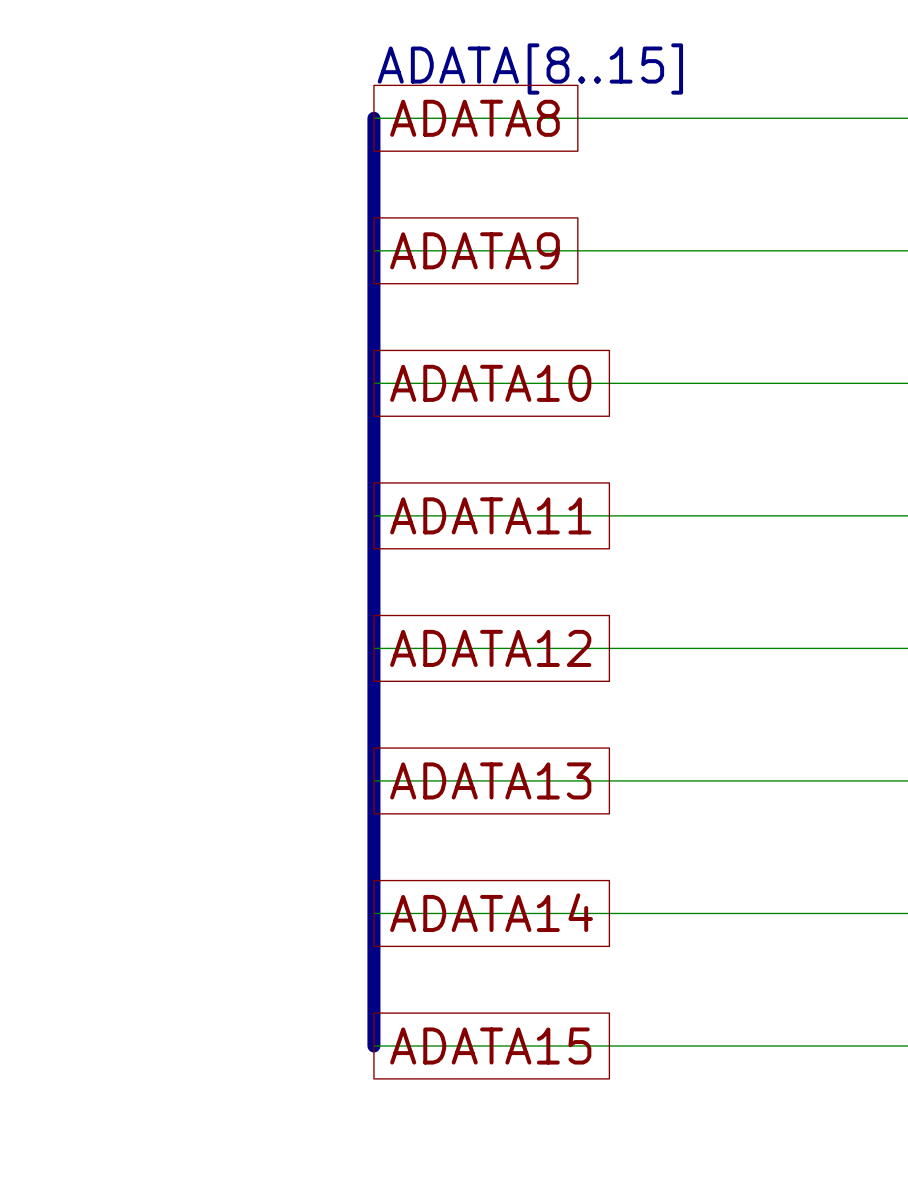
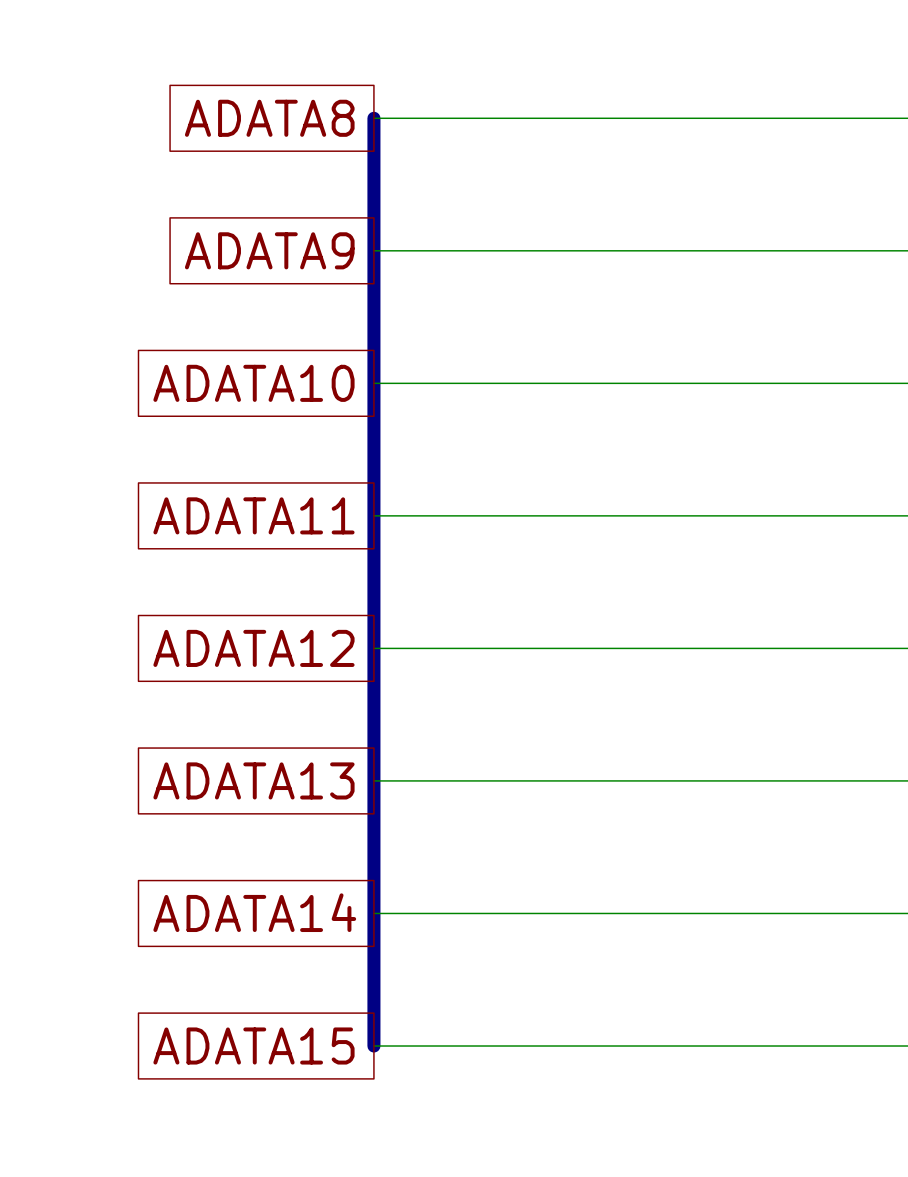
text: ADATA[8..15] (530, 68) -> none
global label rotation: 0° (474, 118) -> 180° (269, 118)
global label rotation: 0° (474, 250) -> 180° (269, 250)
global label rotation: 0° (490, 383) -> 180° (253, 383)
global label rotation: 0° (490, 515) -> 180° (253, 515)
global label rotation: 0° (490, 648) -> 180° (253, 648)
global label rotation: 0° (490, 780) -> 180° (253, 780)
global label rotation: 0° (491, 912) -> 180° (254, 912)
global label rotation: 0° (490, 1046) -> 180° (253, 1046)

